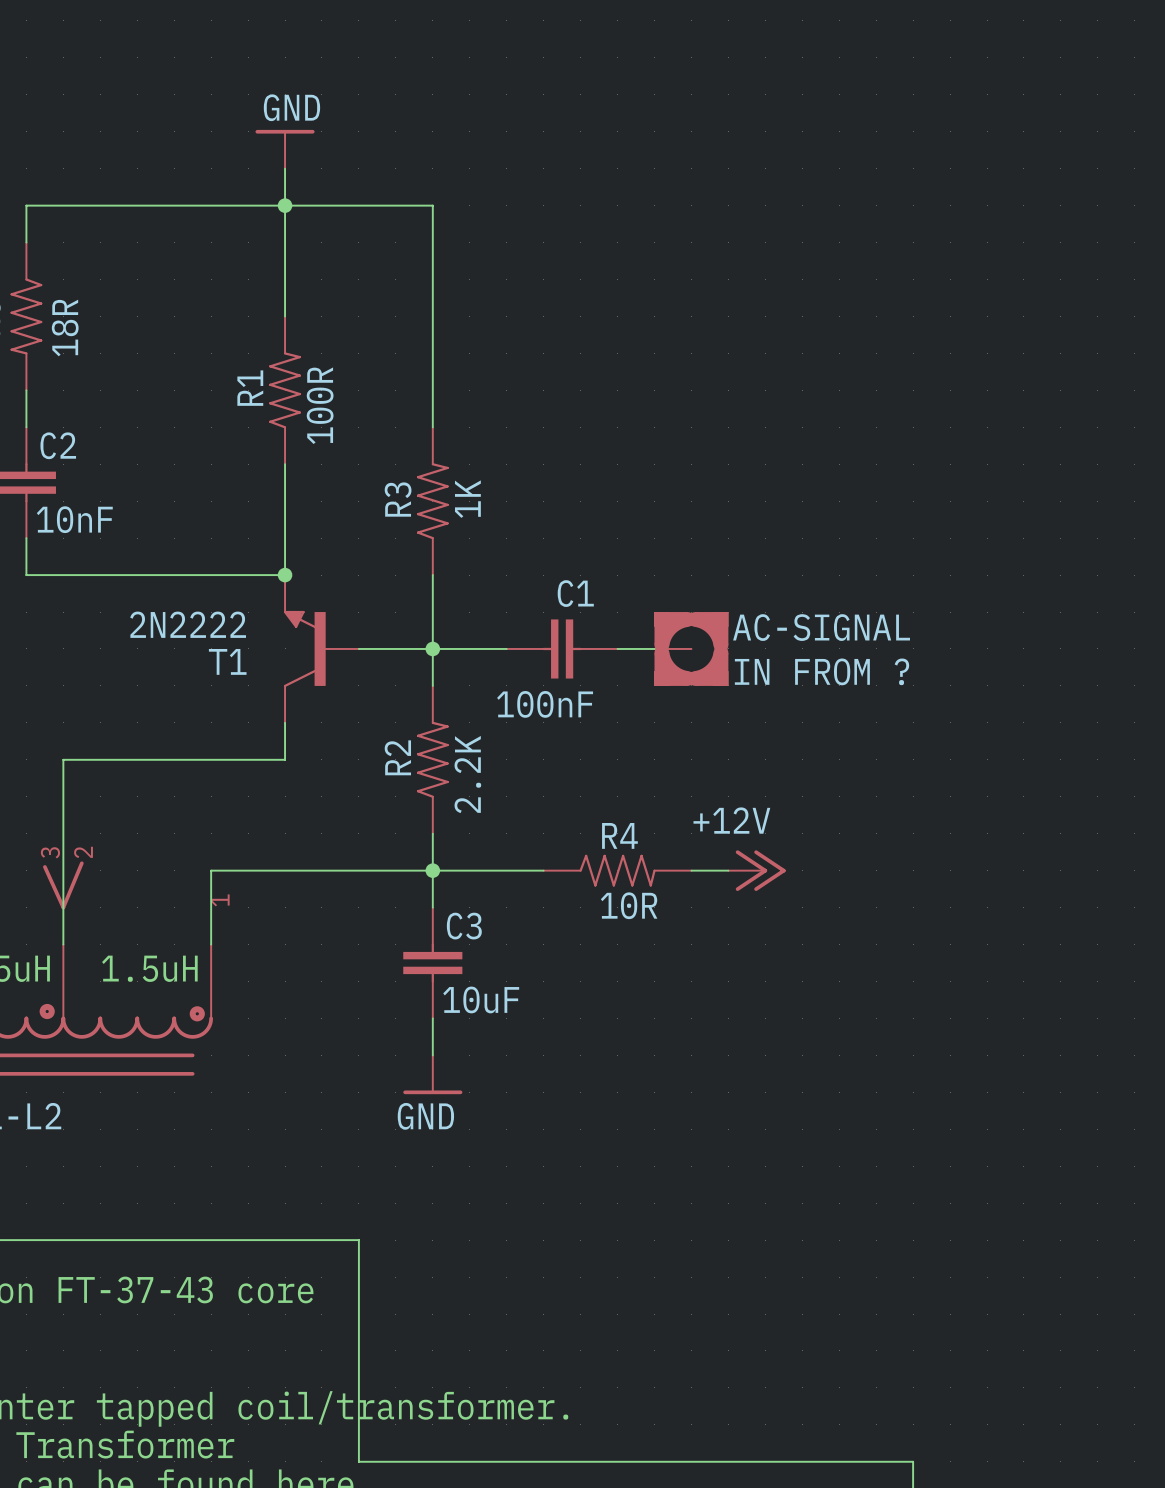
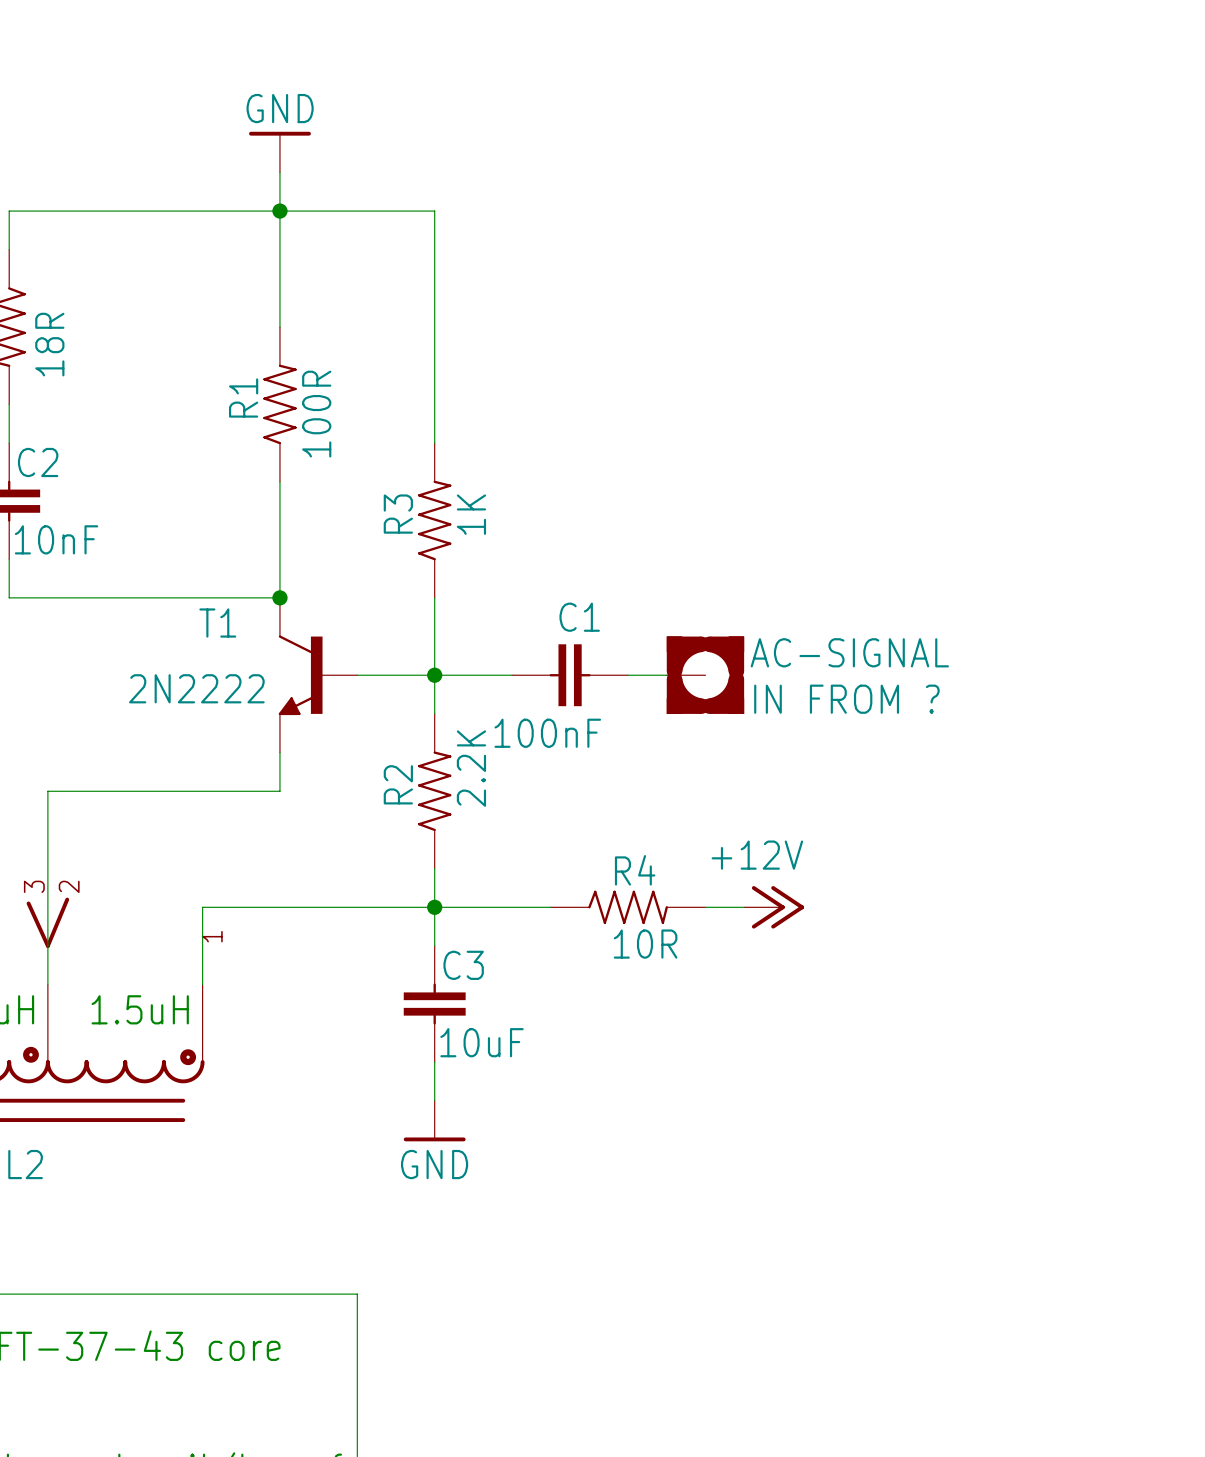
T1 value position: 2N2222 (188, 624) -> 2N2222 (196, 688)
T1 flip: as is (304, 648) -> up-down (300, 675)
T1 name position: T1 (227, 661) -> T1 (217, 623)
R2 value position: 2.2K (467, 774) -> 2.2K (471, 768)

